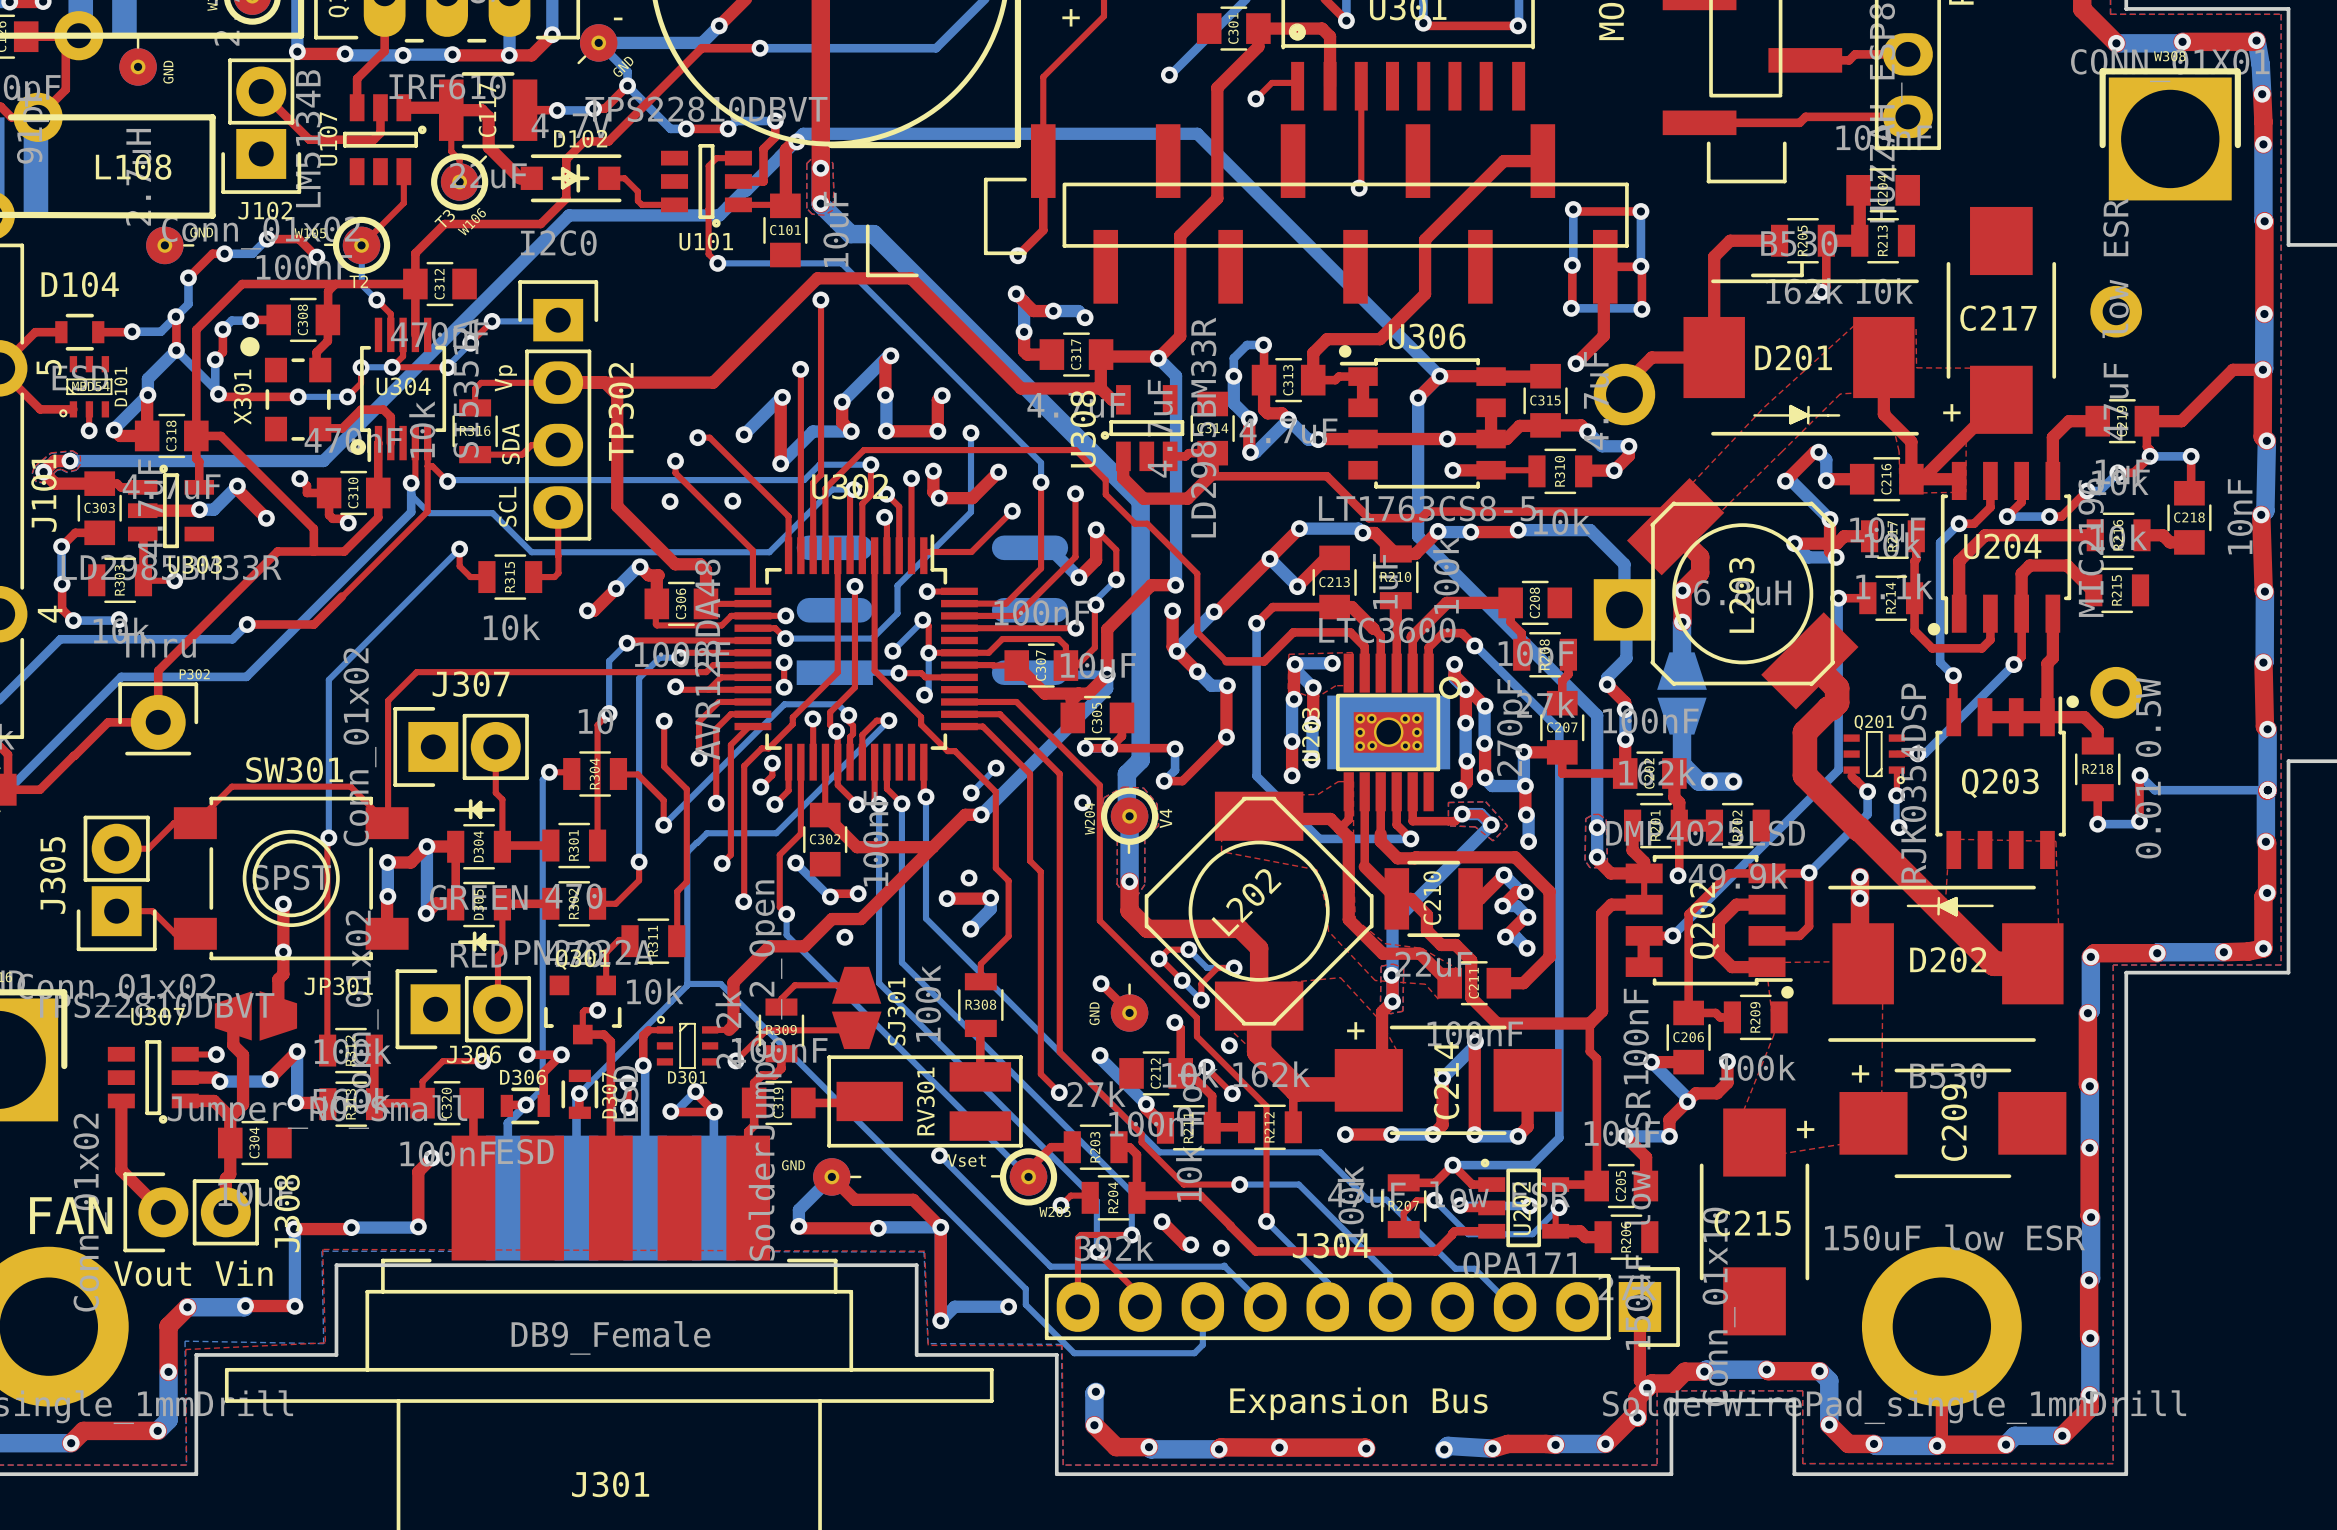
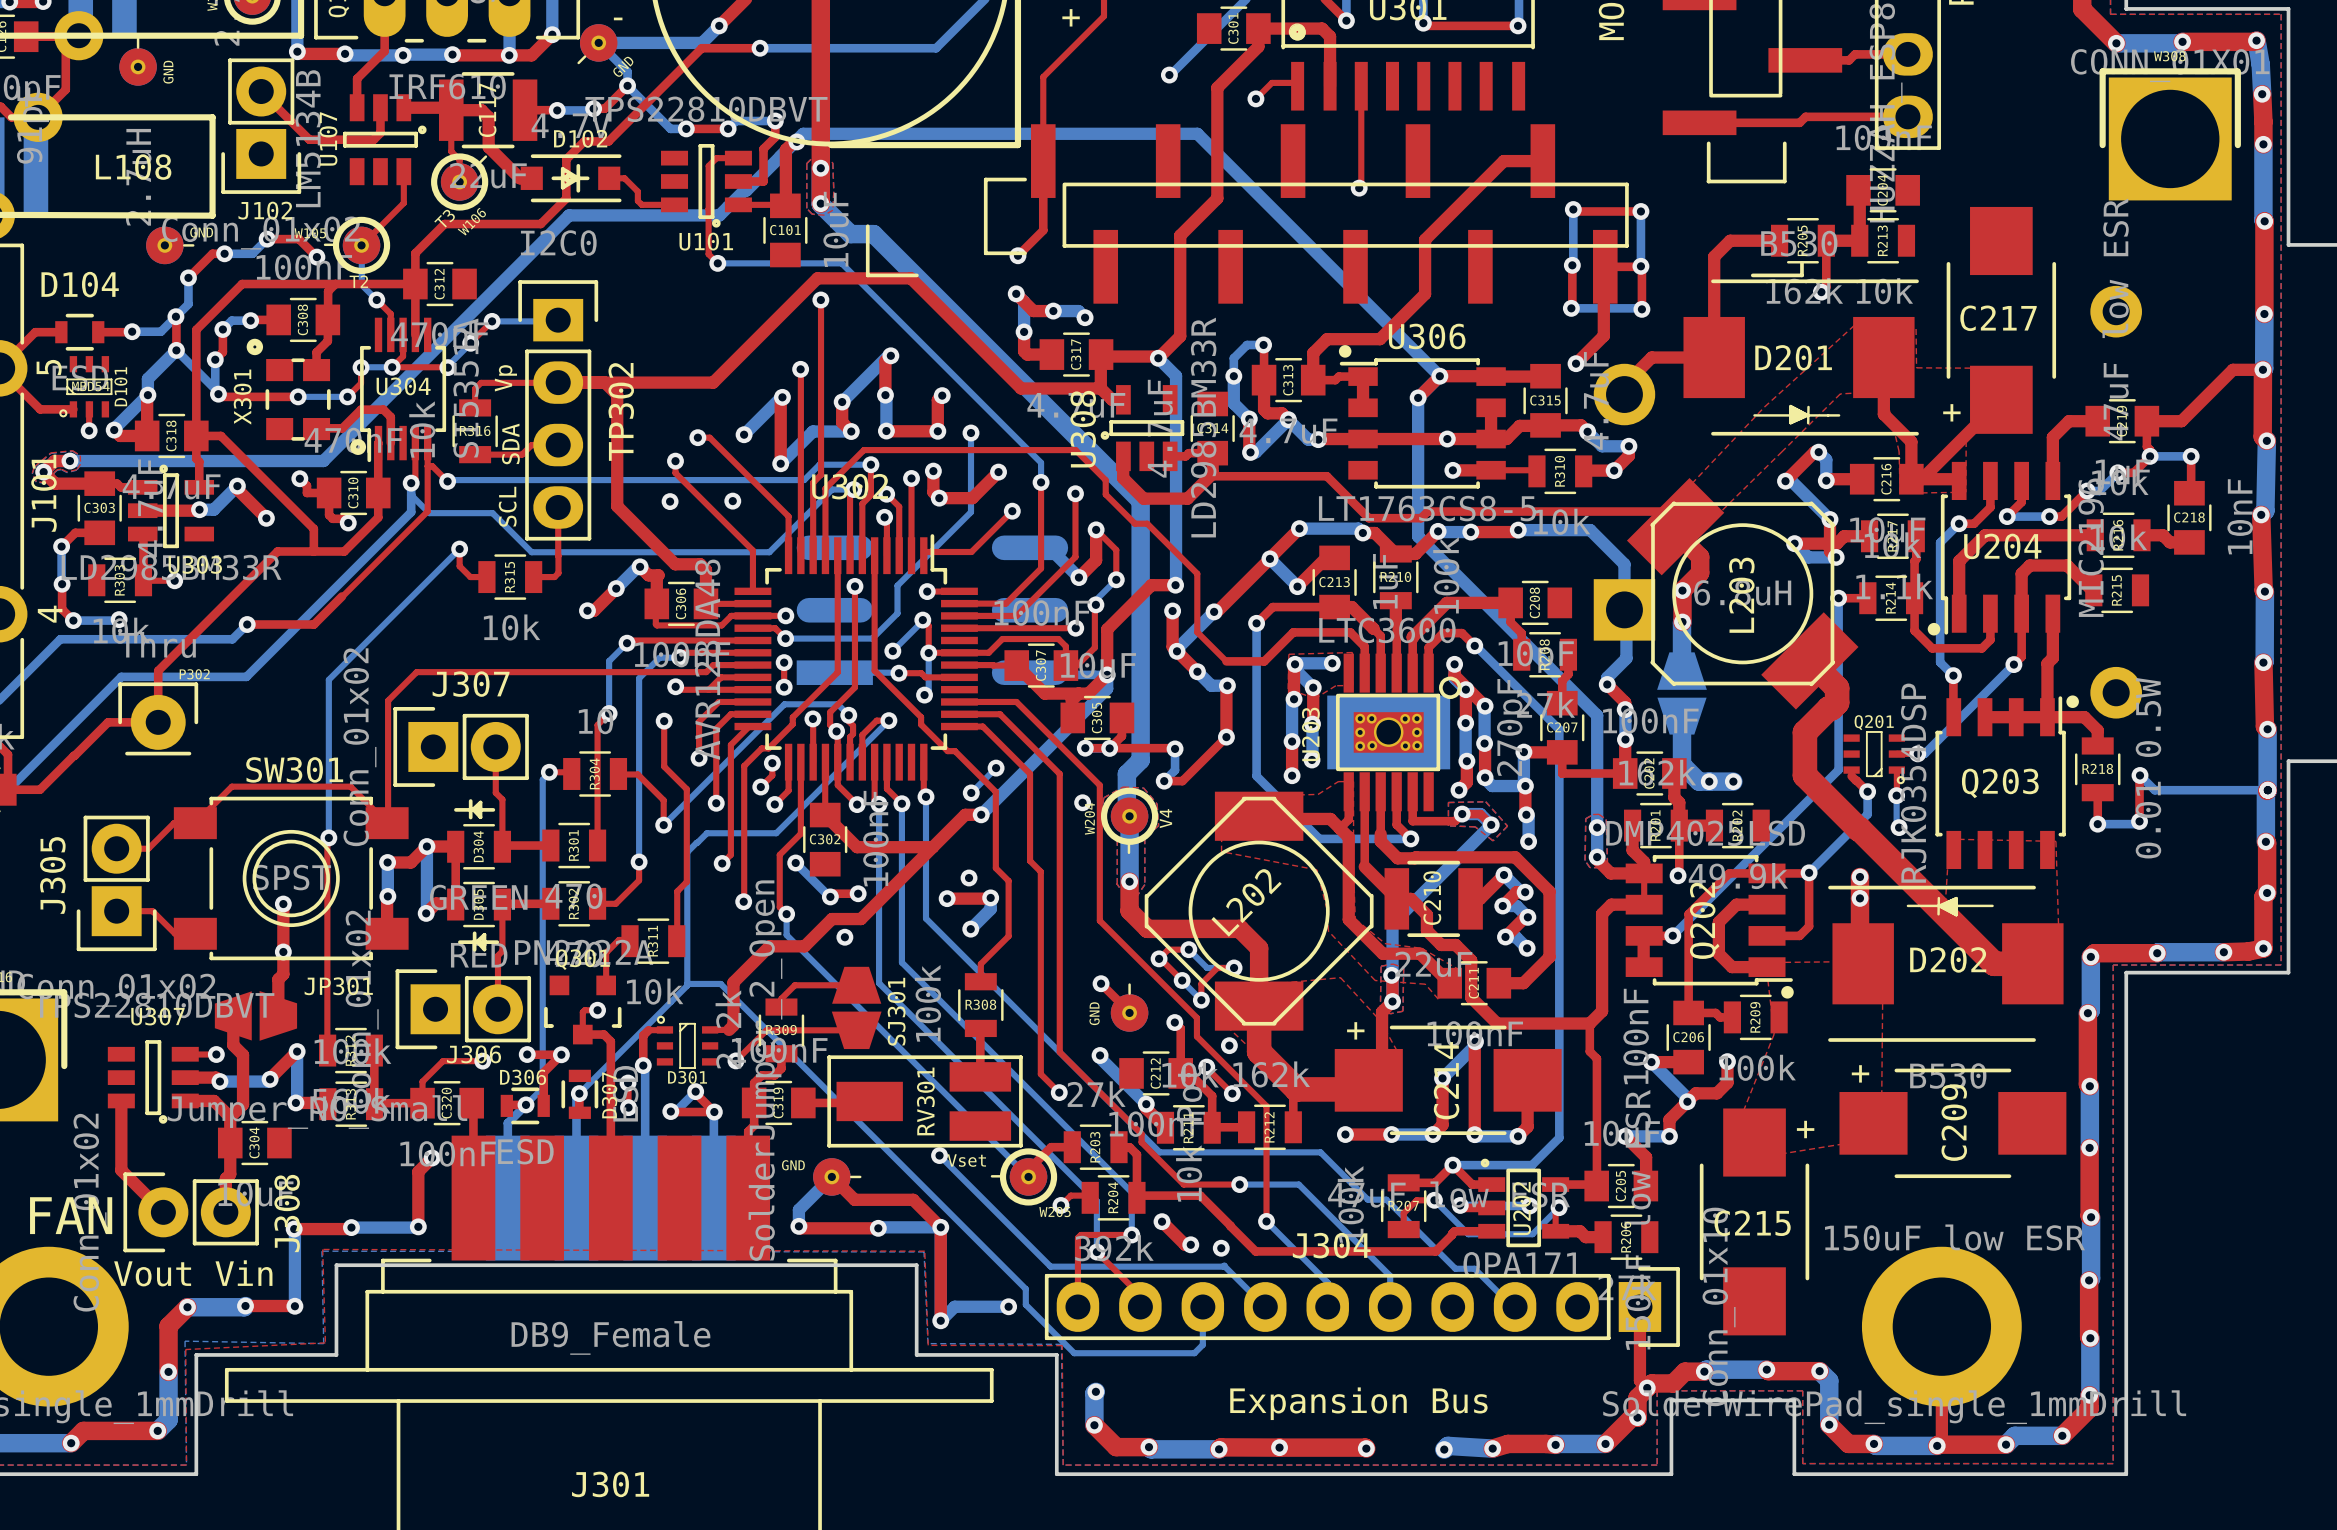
X301 footprint: [240, 337, 332, 442] -> [246, 338, 331, 441]

